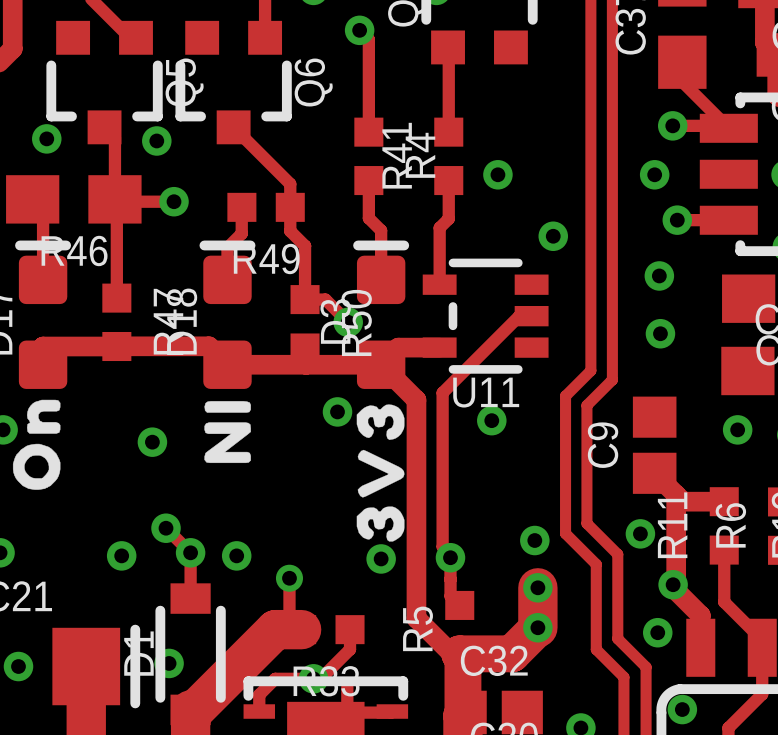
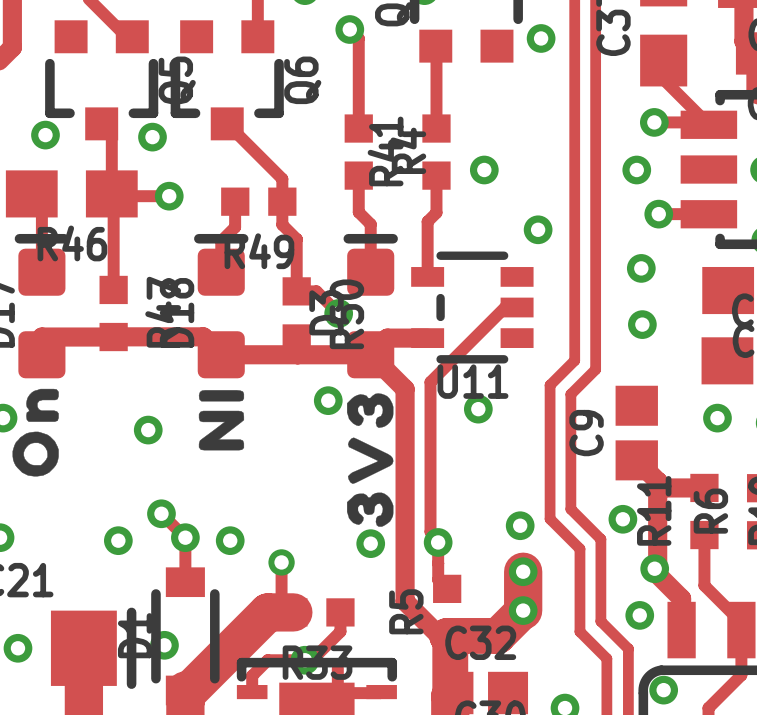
via: none -> (541, 38)

